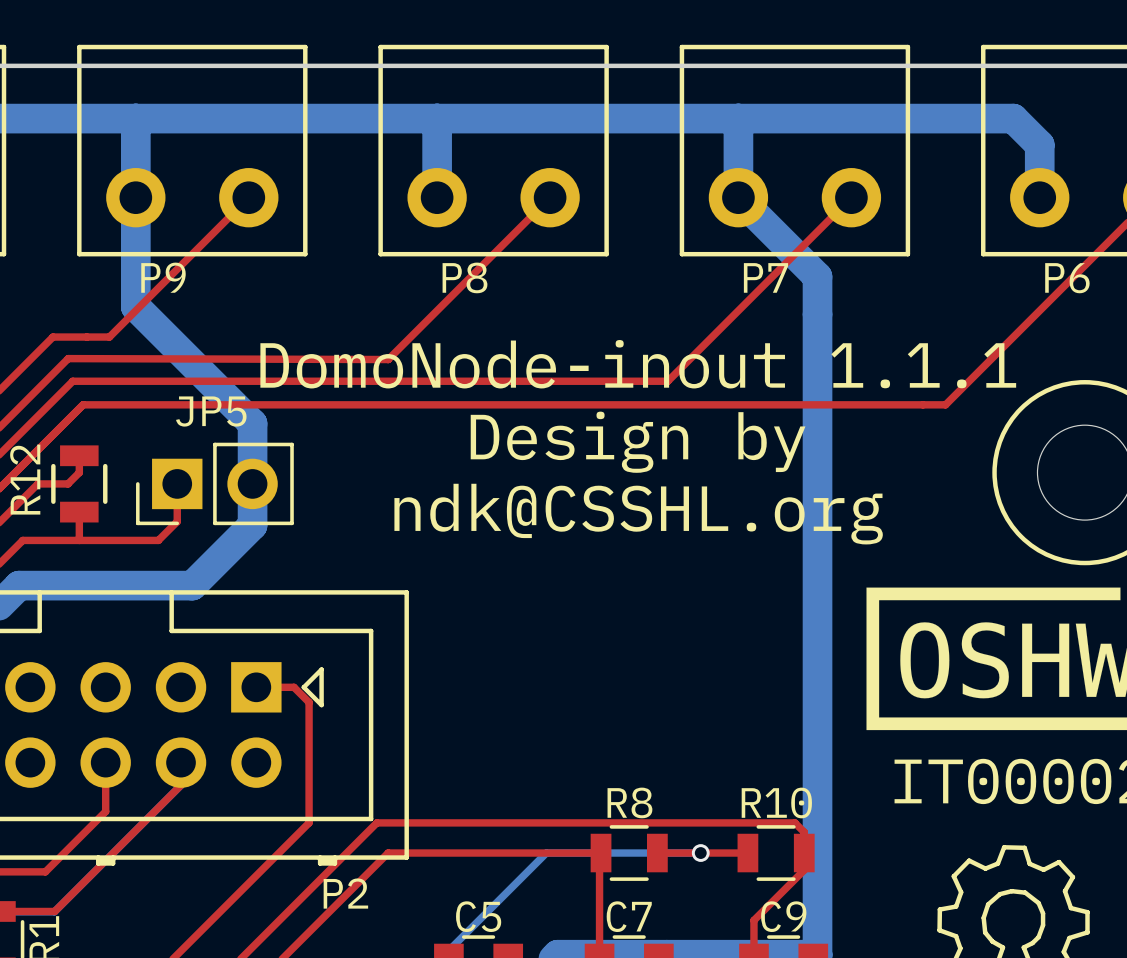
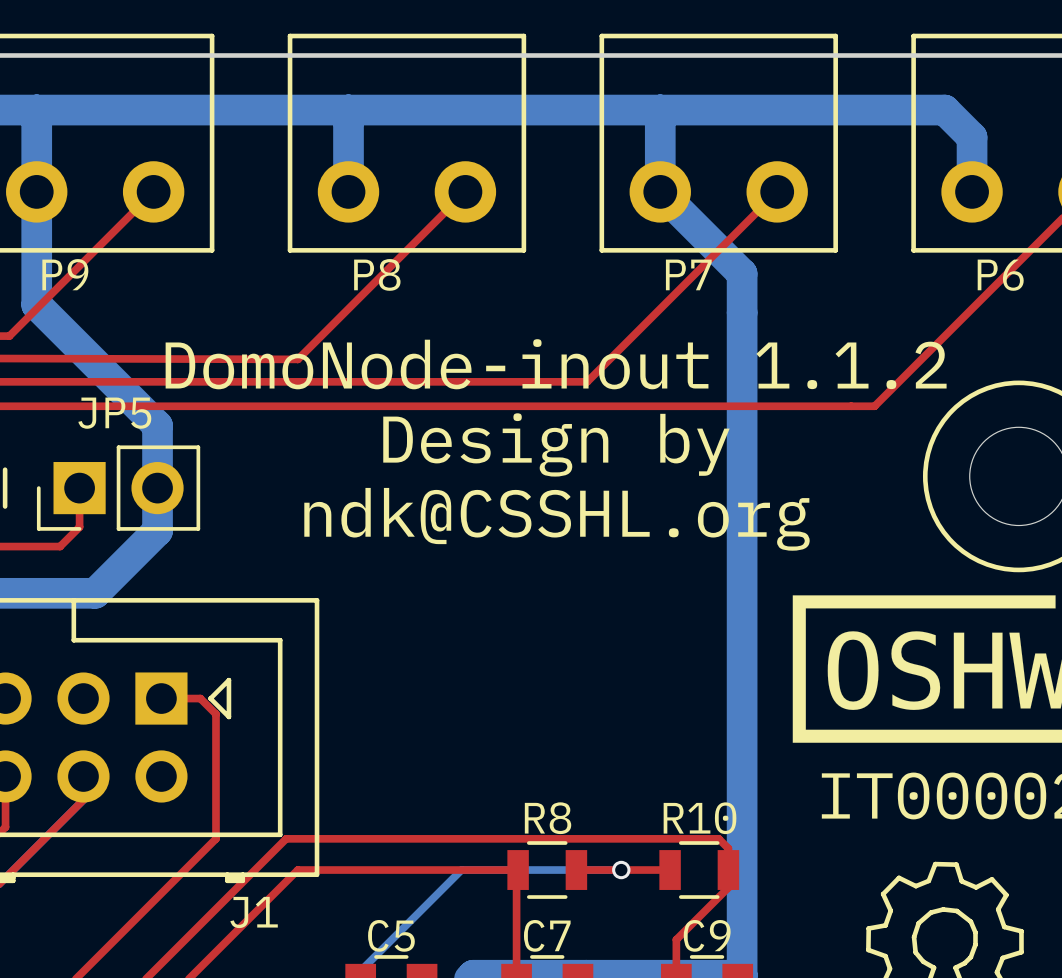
text: DomoNode-inout 1.1.1 (638, 364) -> DomoNode-inout 1.1.2 (556, 364)
P2 name: P2 (345, 893) -> J1 (254, 912)

